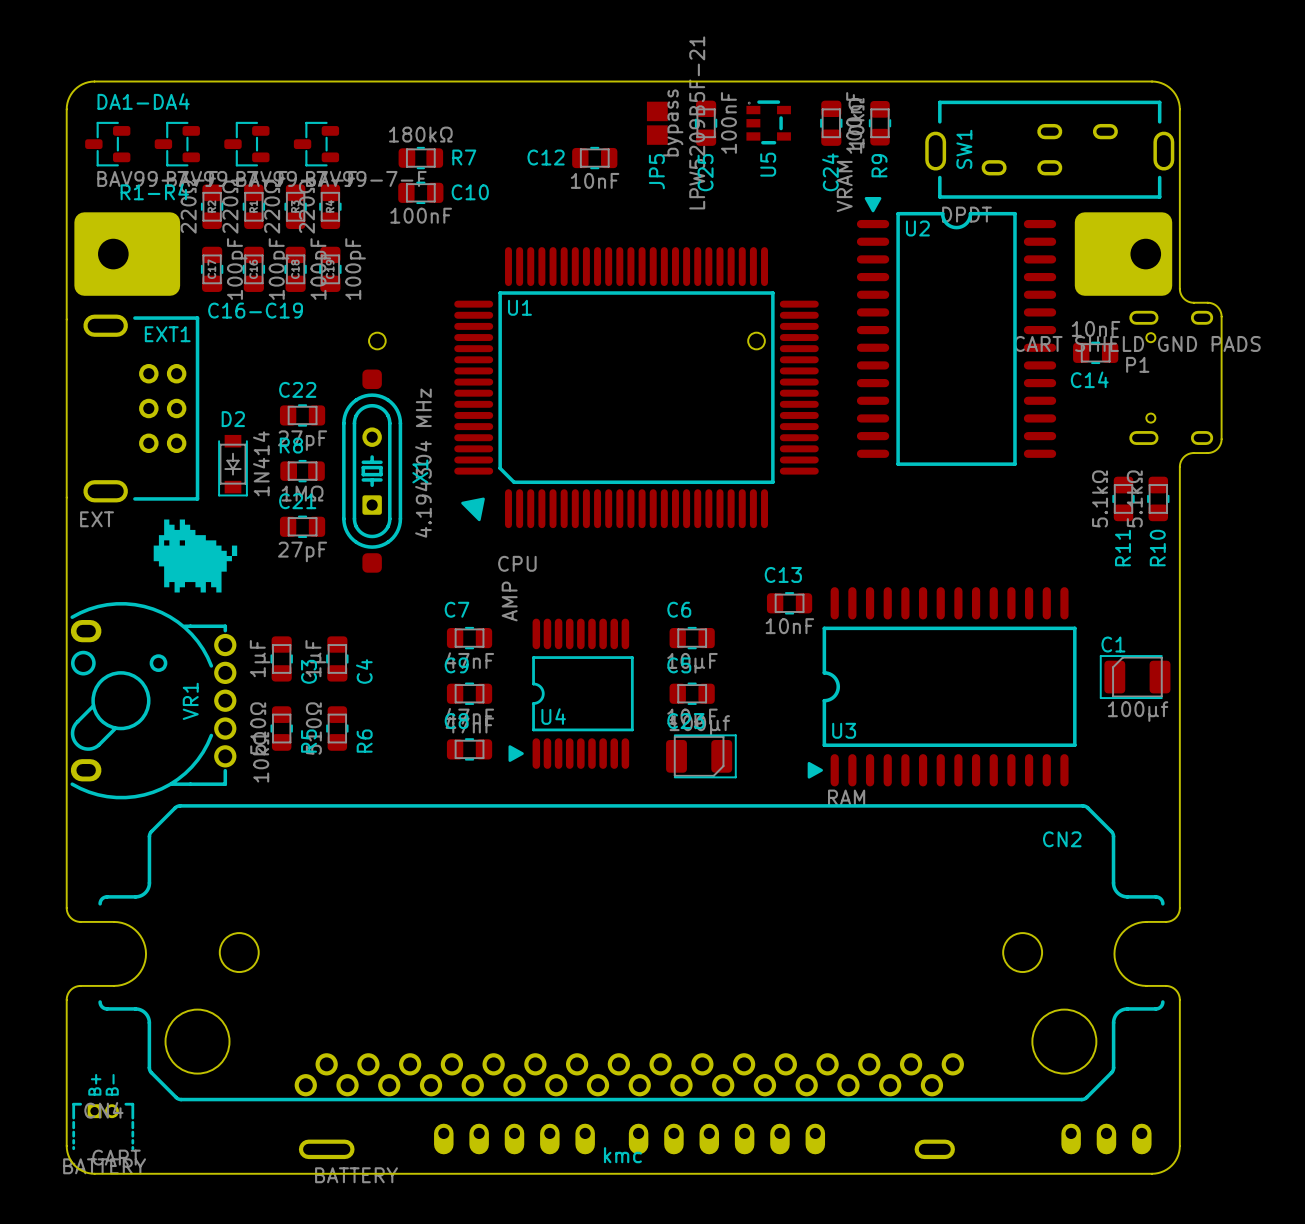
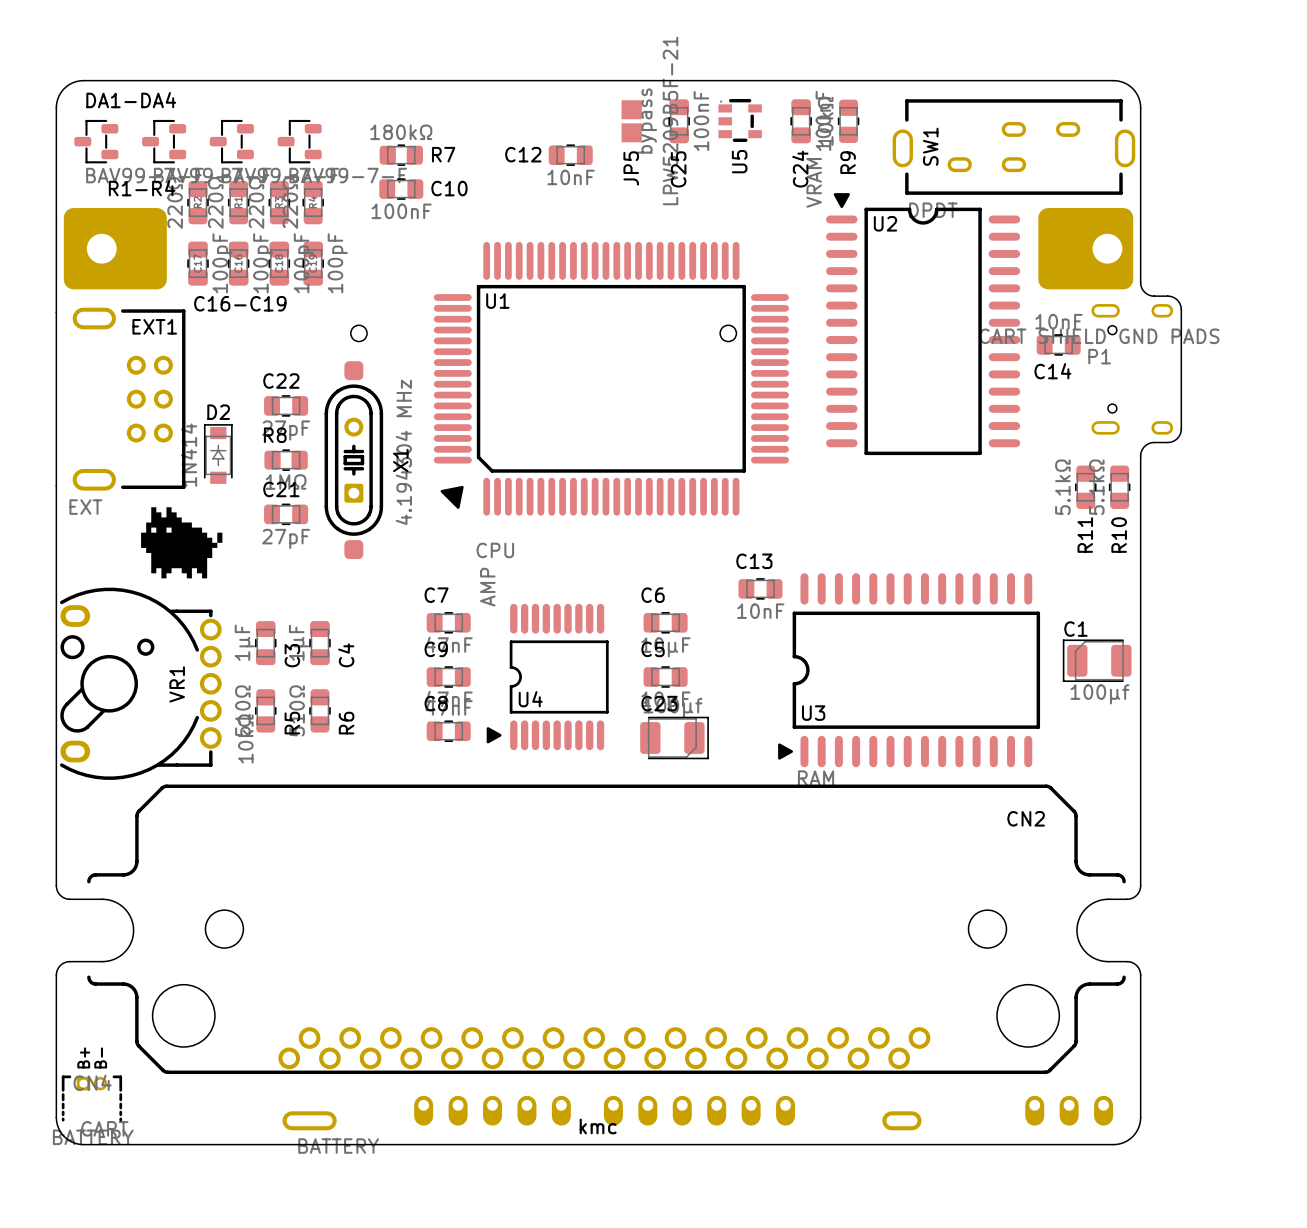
D2 rotation: 0° (232, 465) -> 180° (218, 453)

